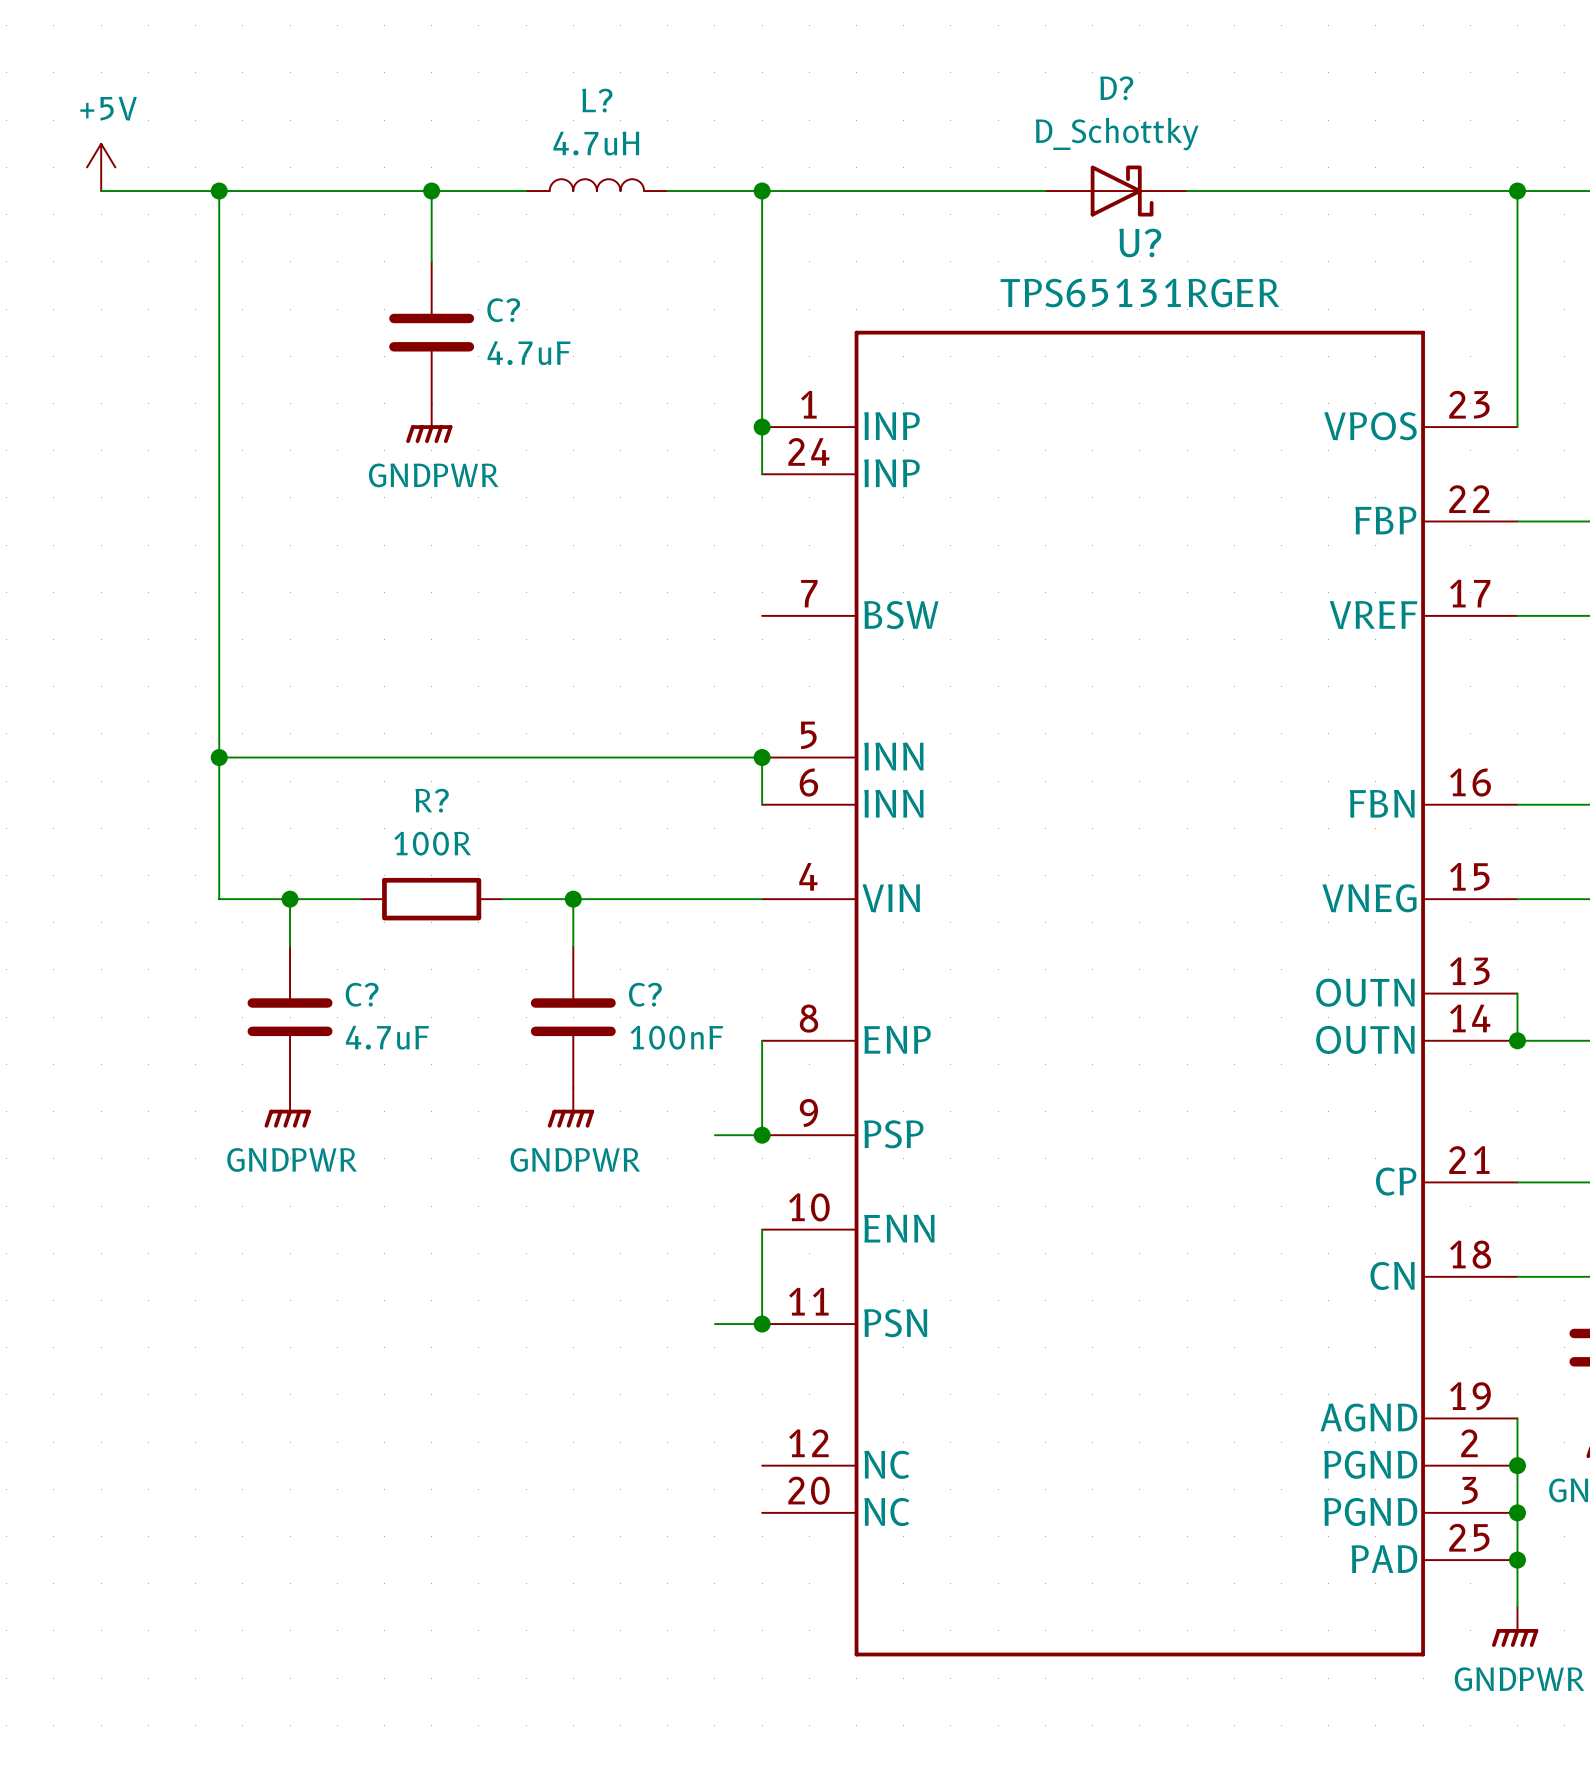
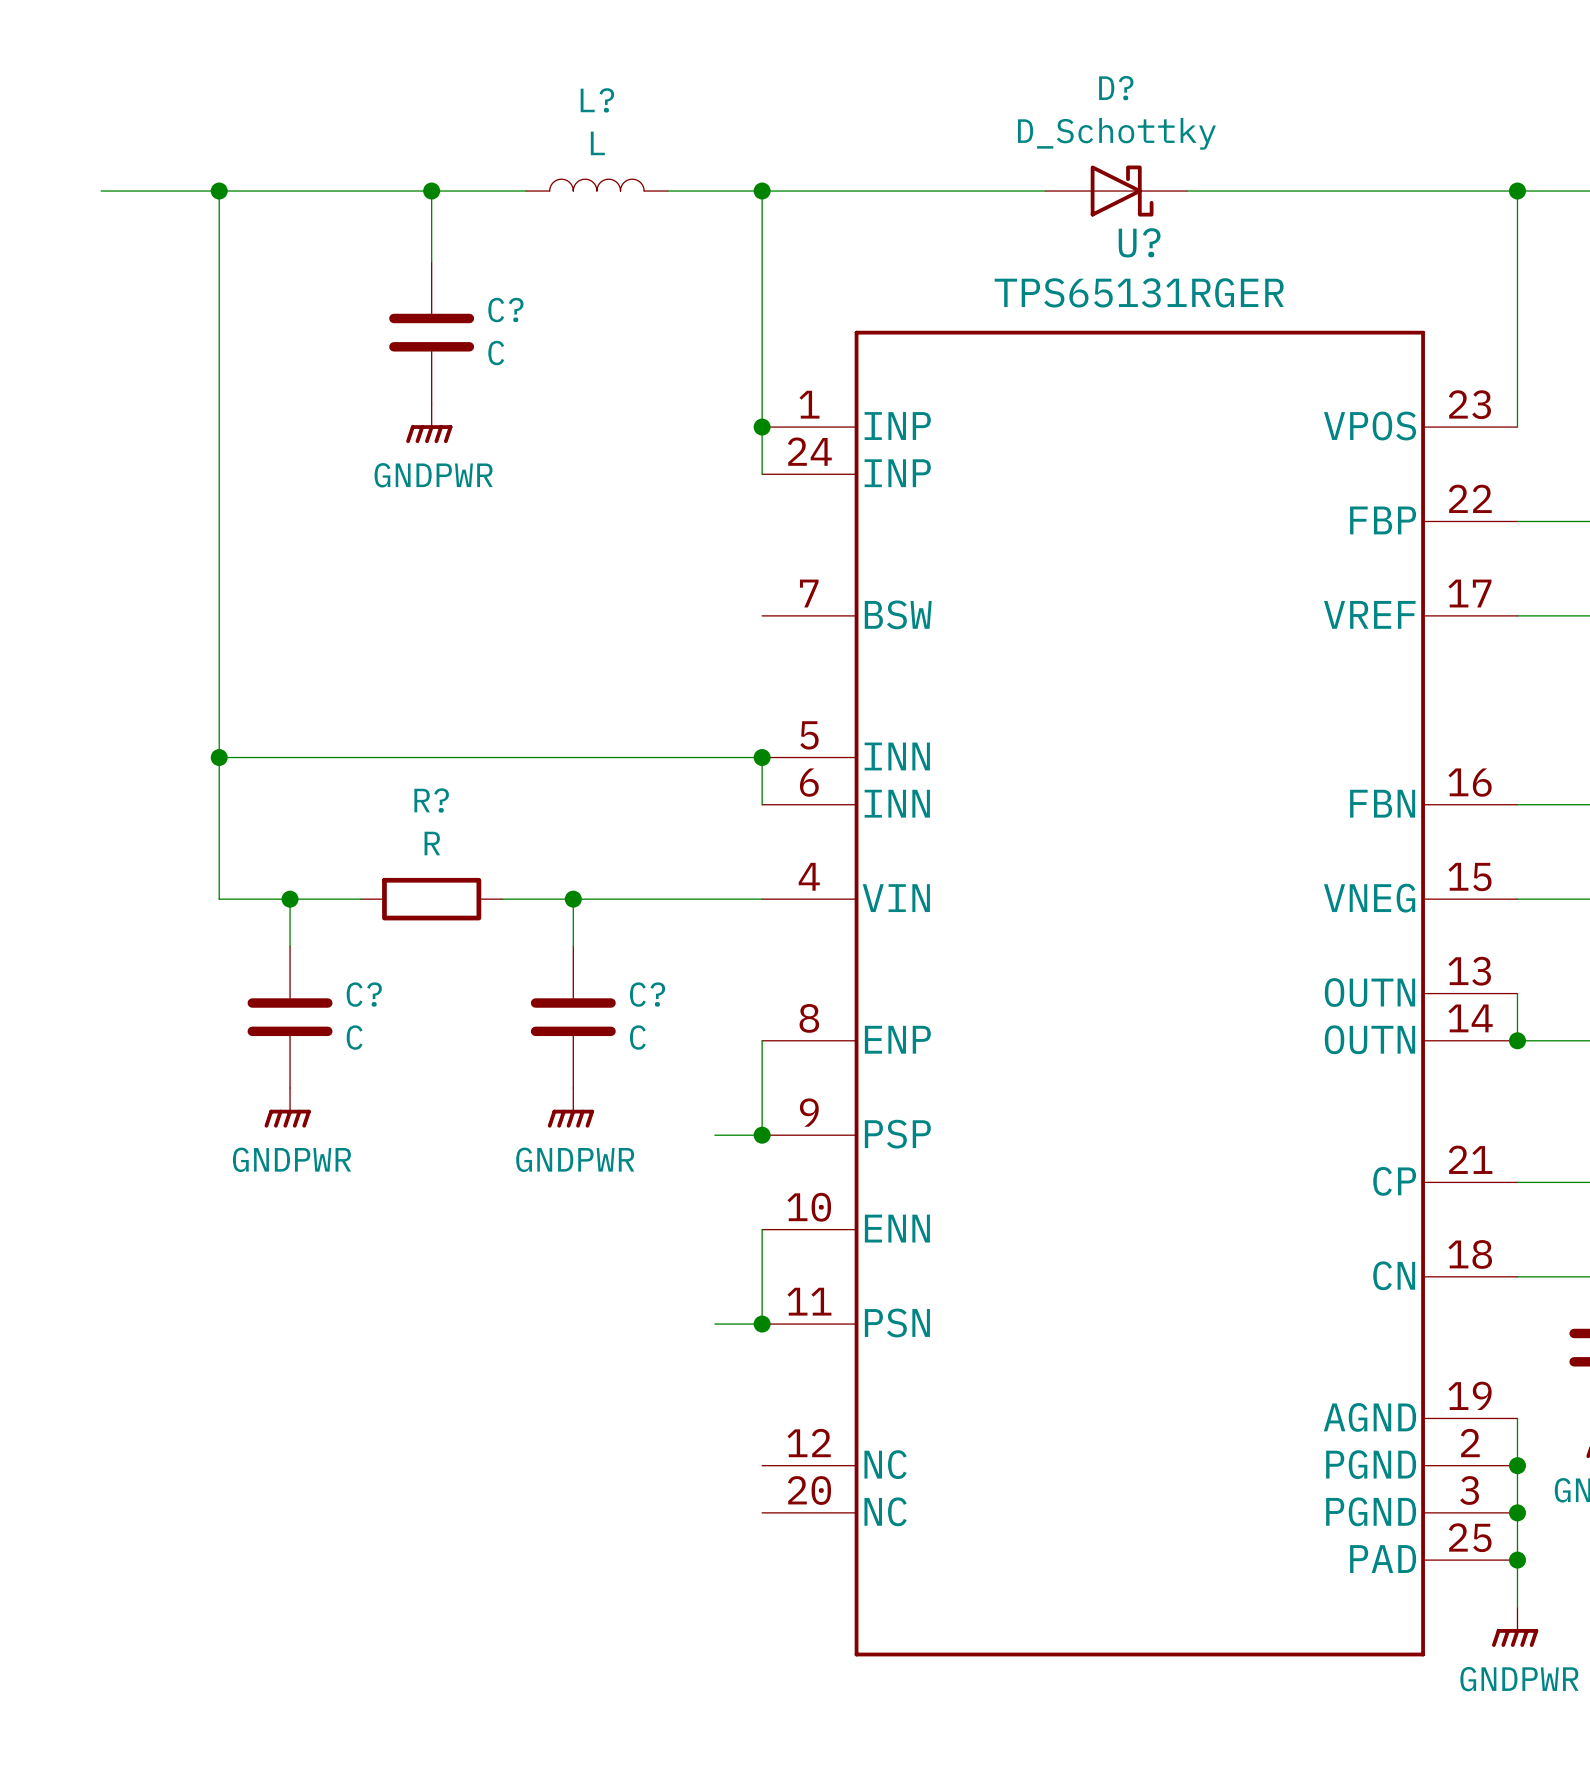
L? value: 4.7uH (596, 143) -> L (597, 143)
power symbol: +5V (101, 167) -> none
C? value: 4.7uF (529, 353) -> C (496, 353)
R? value: 100R (432, 843) -> R (432, 843)
C? value: 4.7uF (387, 1037) -> C (354, 1037)
C? value: 100nF (676, 1037) -> C (637, 1037)

